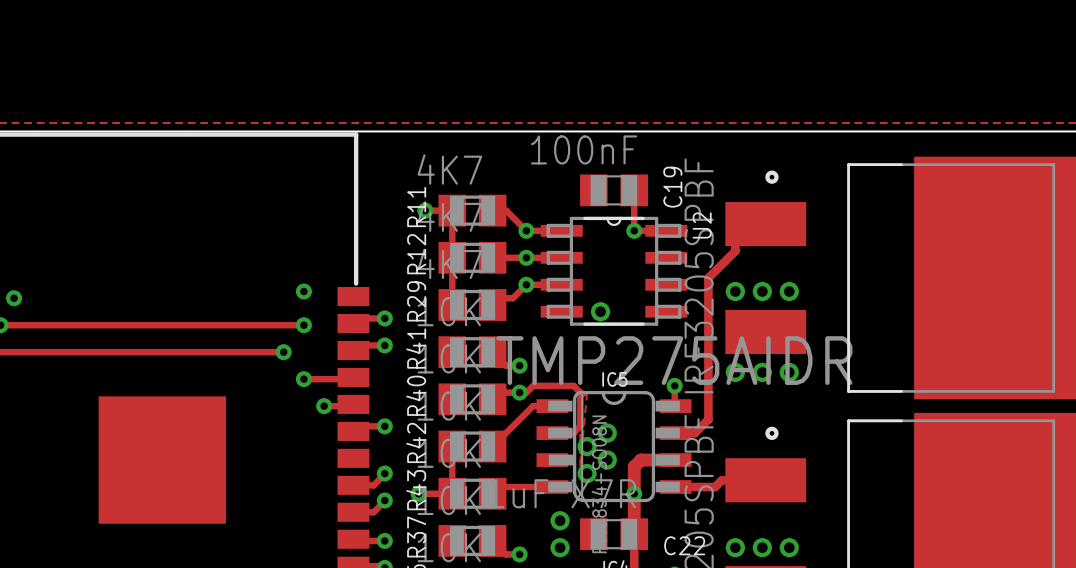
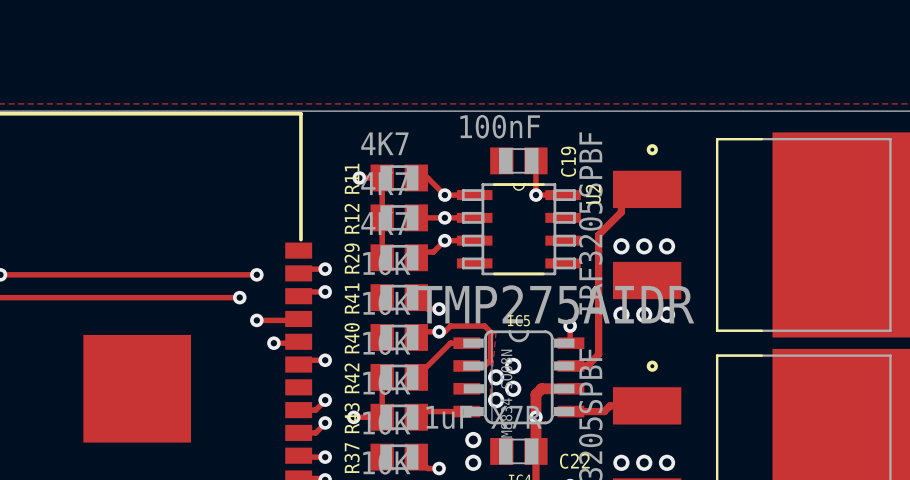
via: (303, 291) -> none
via: (14, 298) -> none
via: (600, 311) -> none

